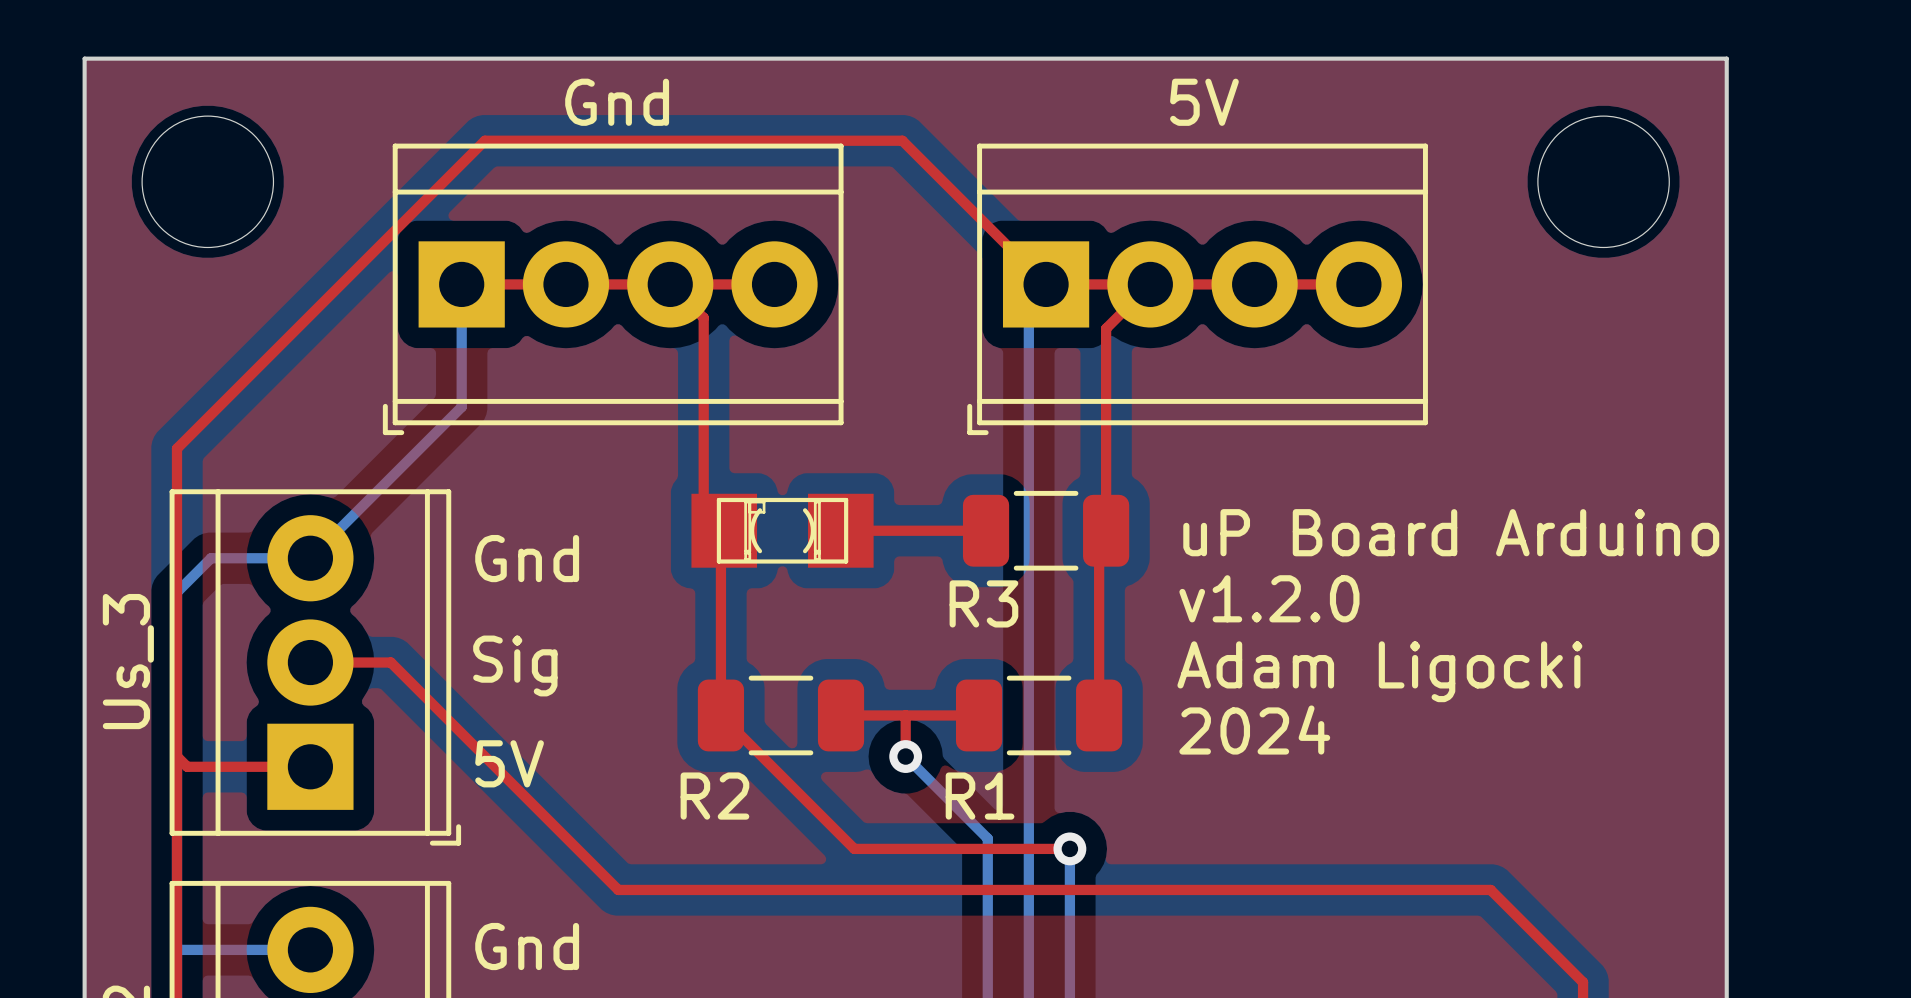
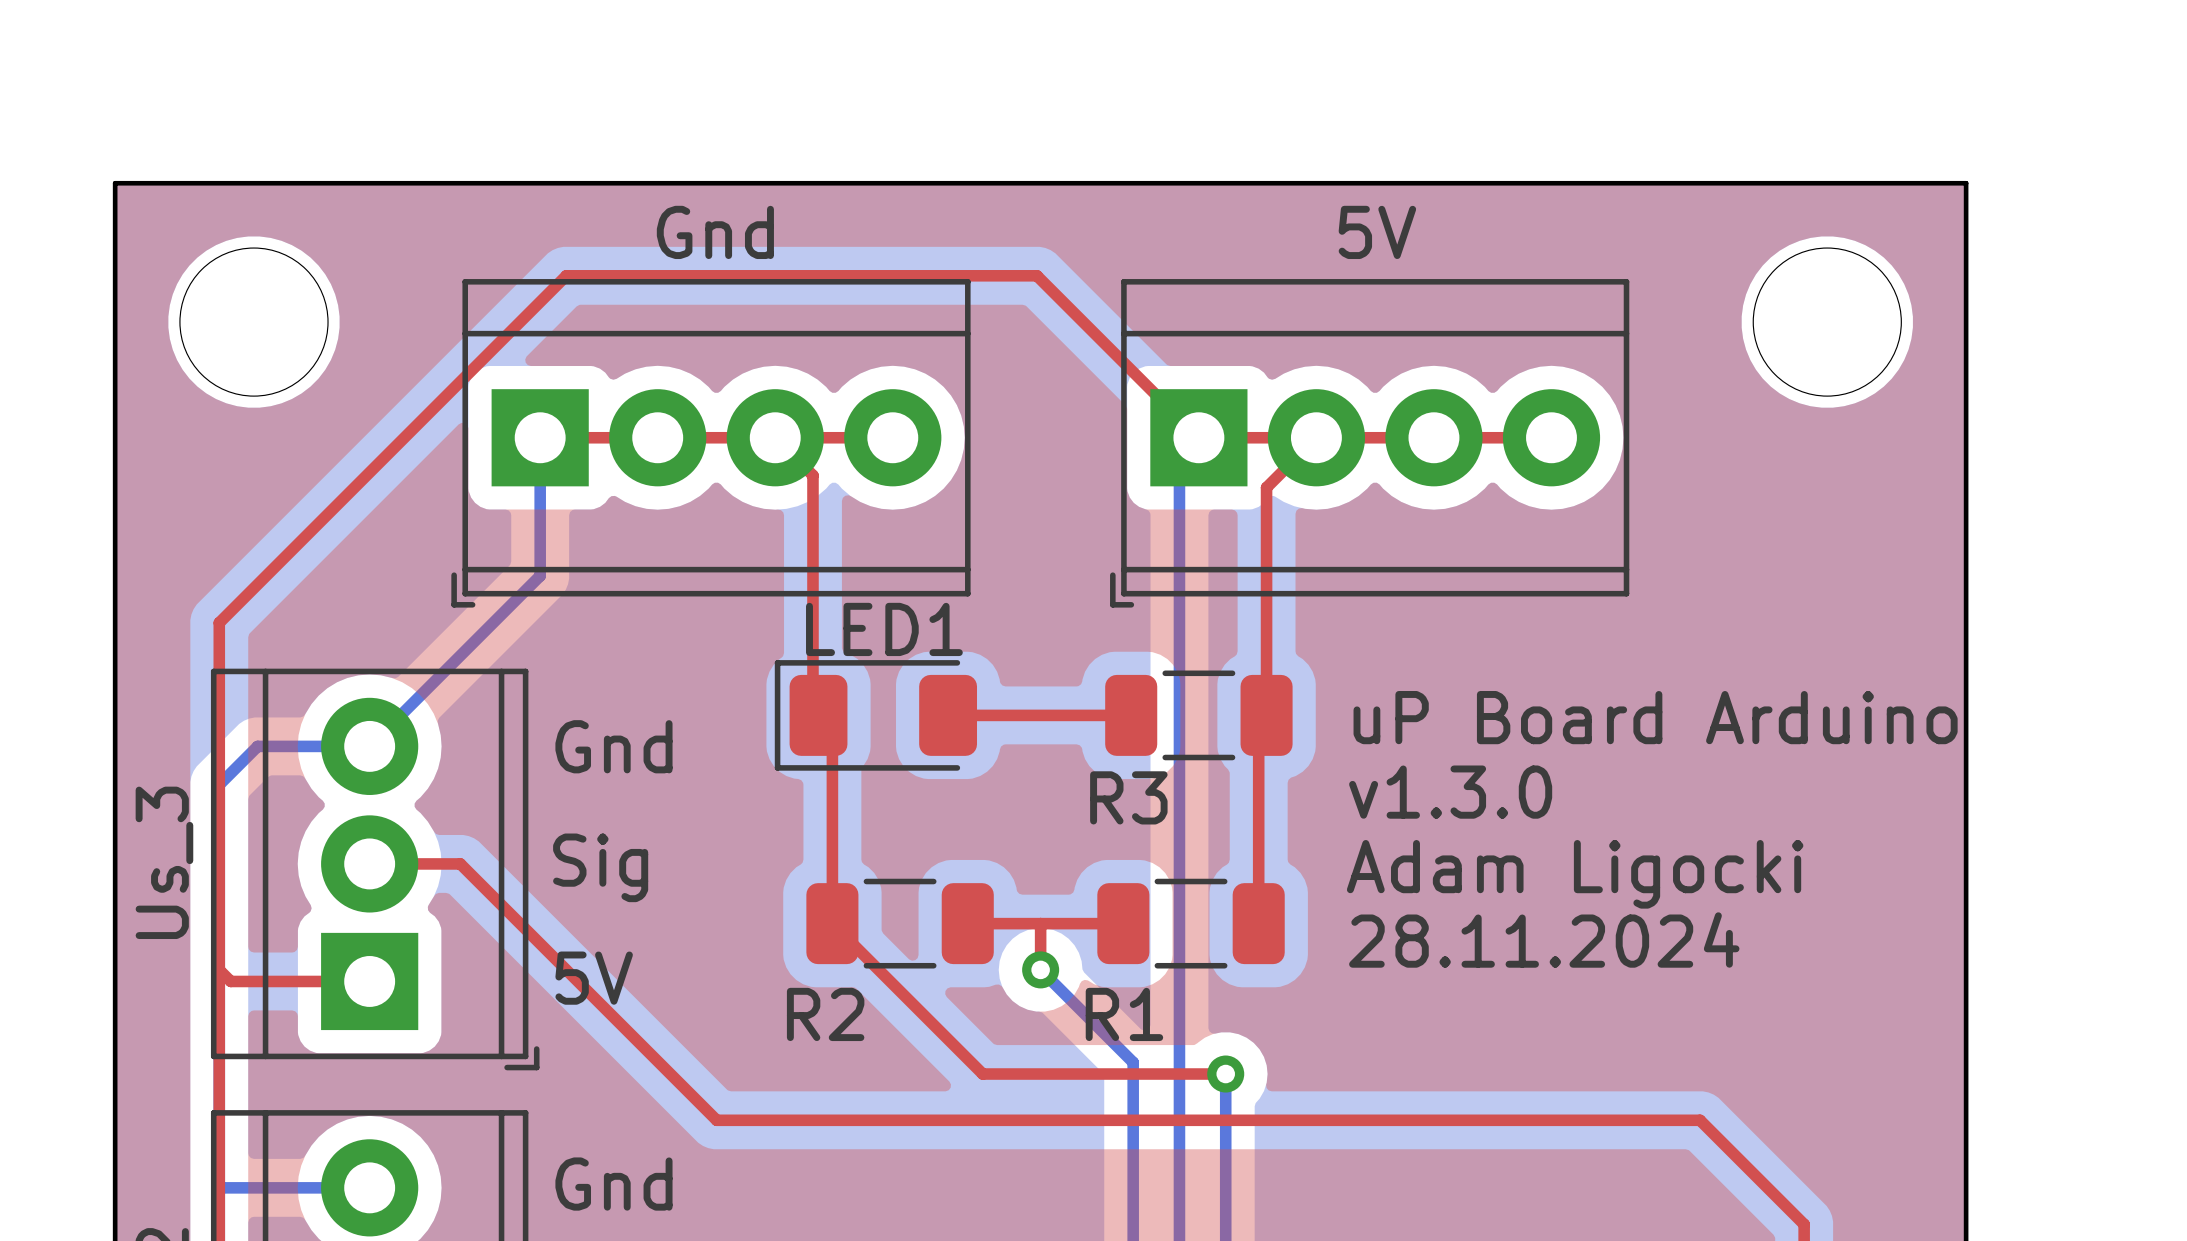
LED1: none -> (875, 715)
part: (782, 530) -> none
text: v1.2.0 (1269, 598) -> v1.3.0 (1450, 792)
text: 2024 (1254, 730) -> 28.11.2024 (1544, 940)

